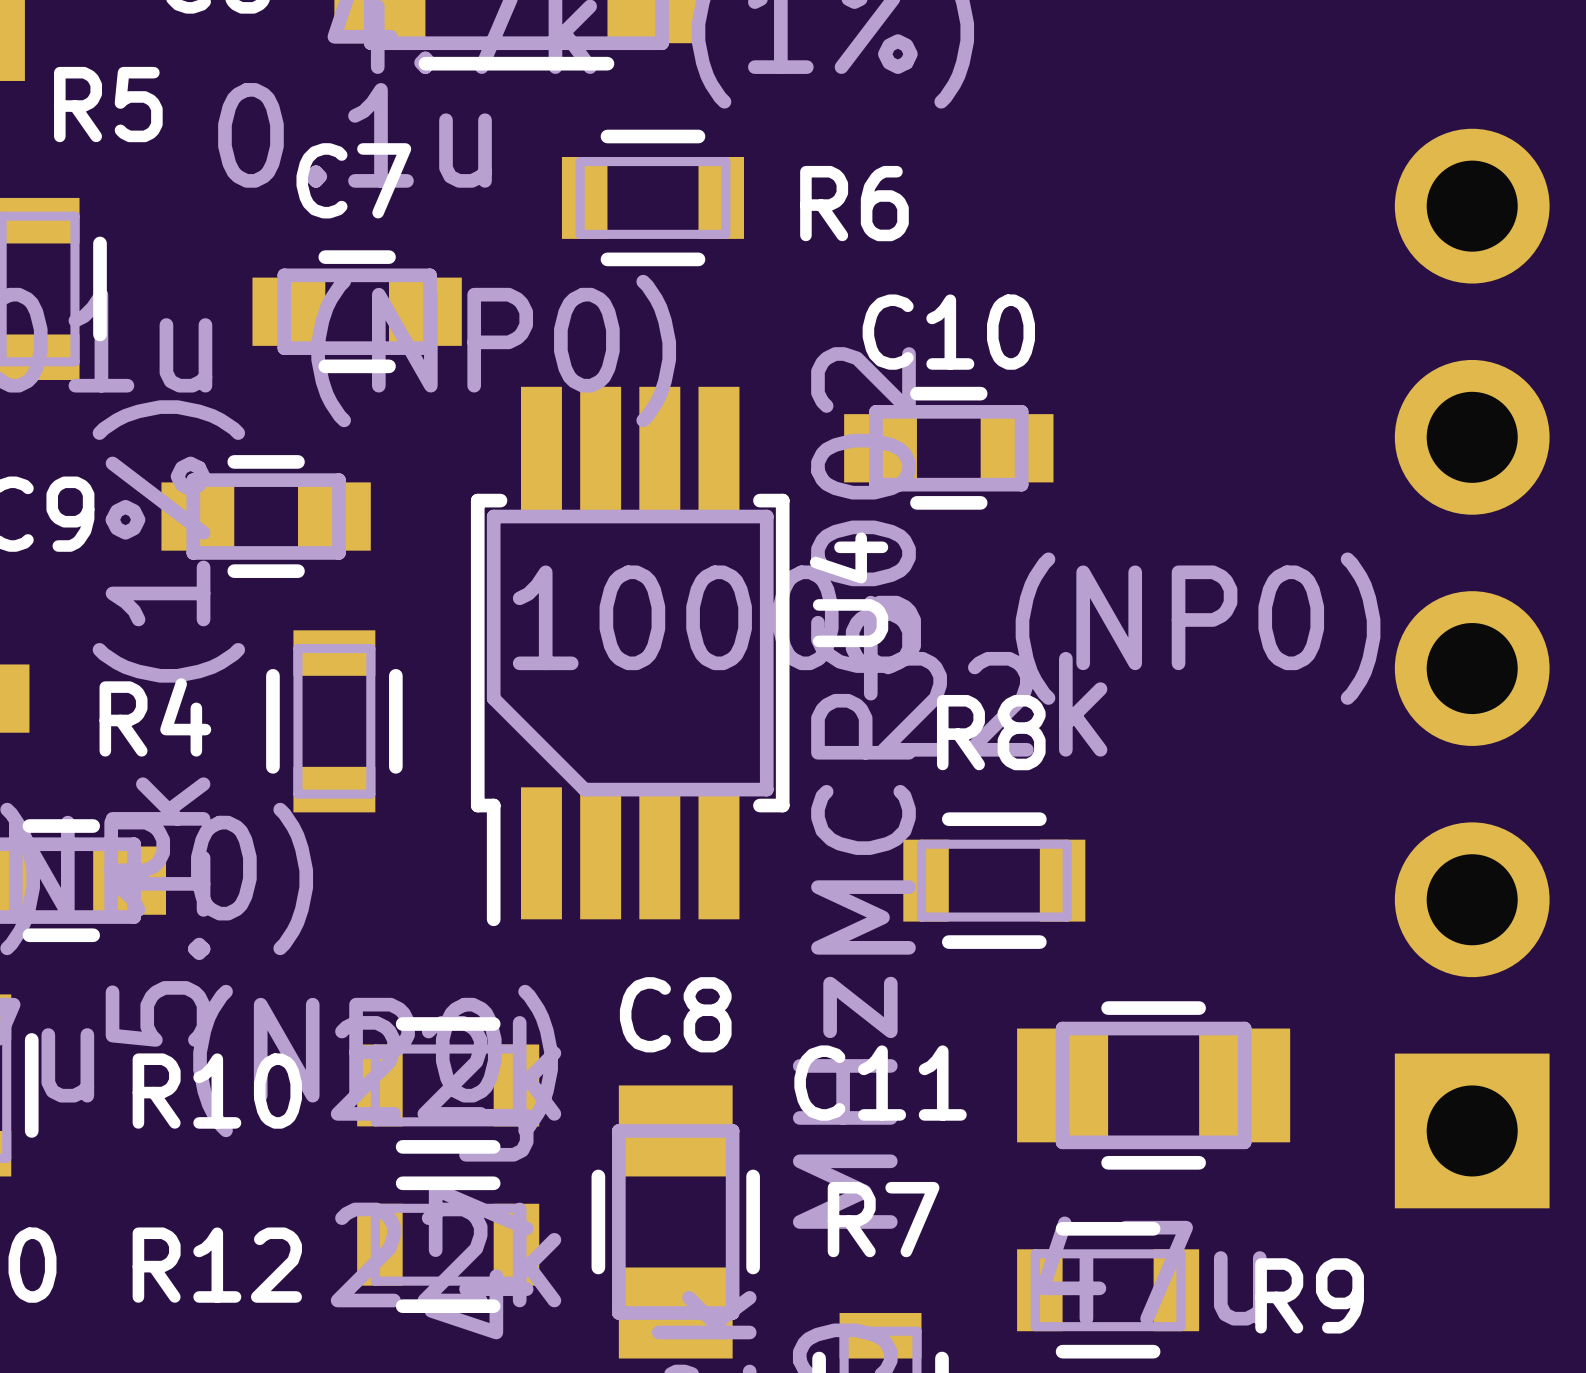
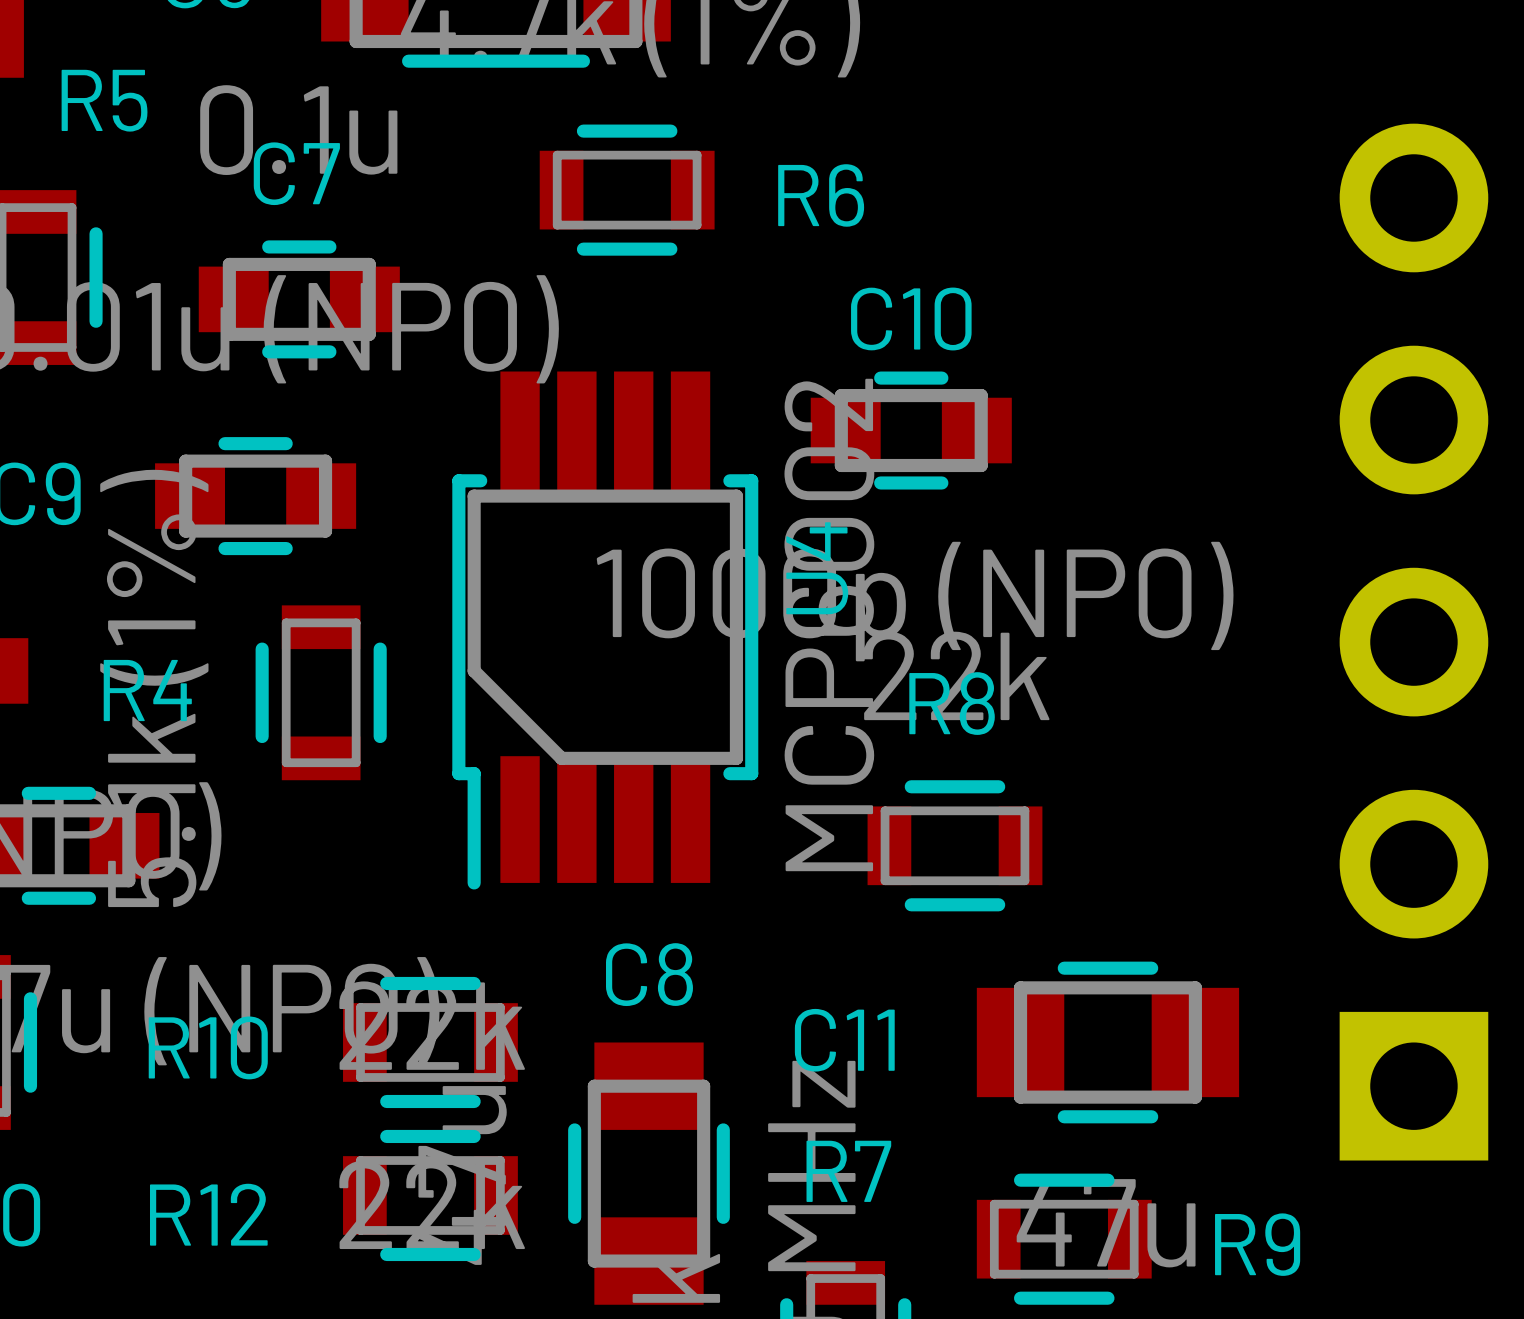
C7 position: (357, 311) -> (299, 299)

